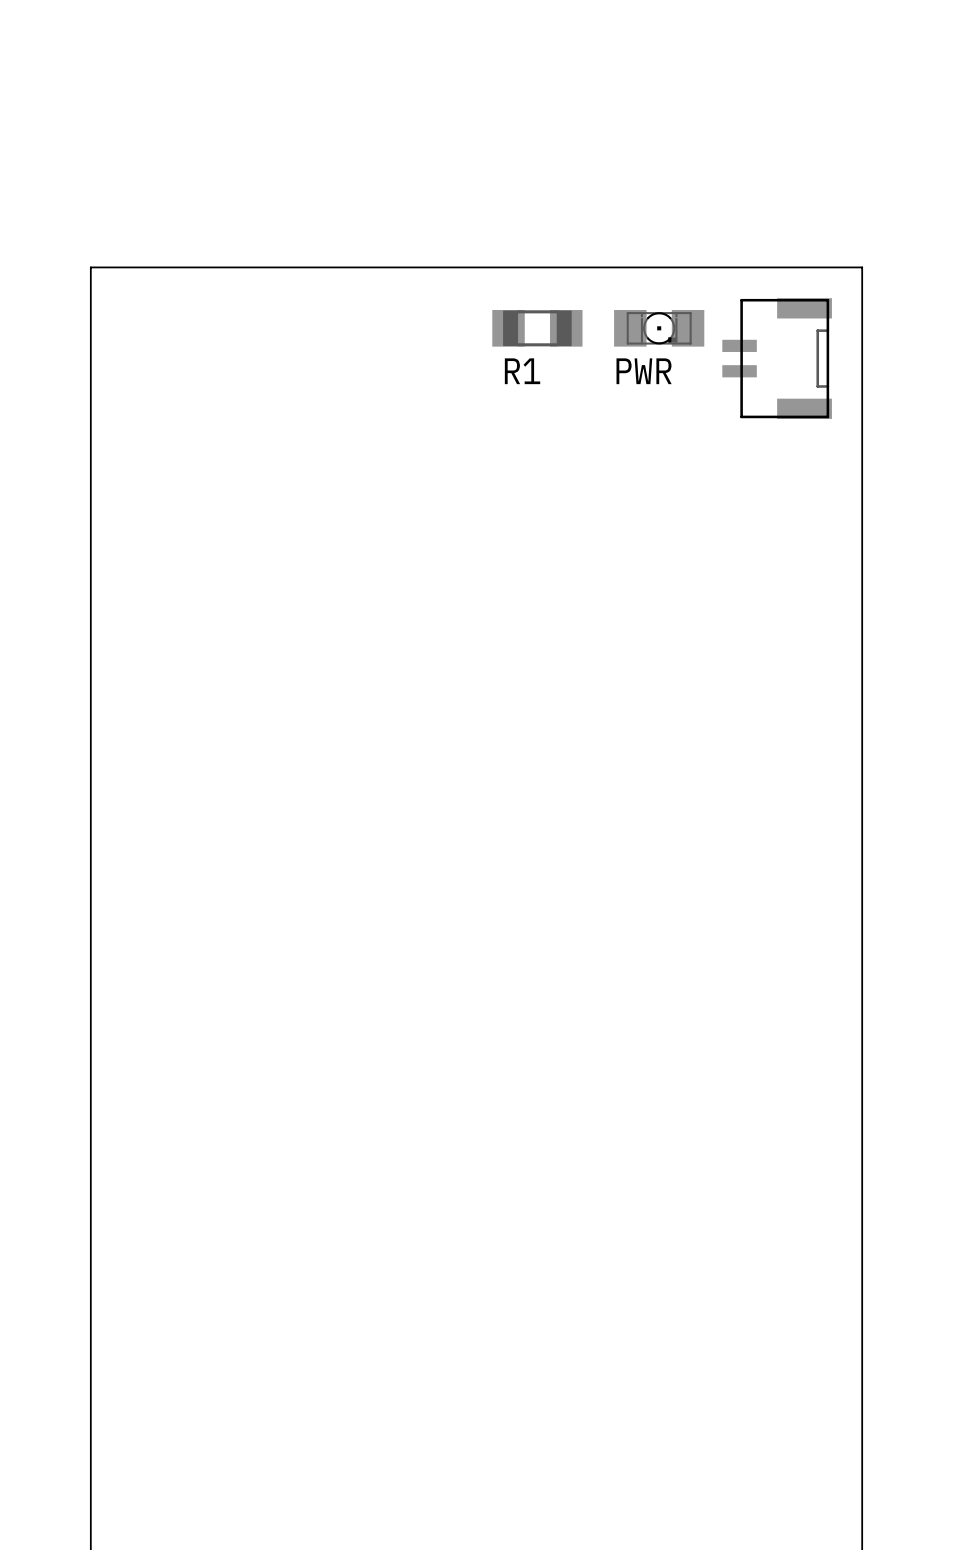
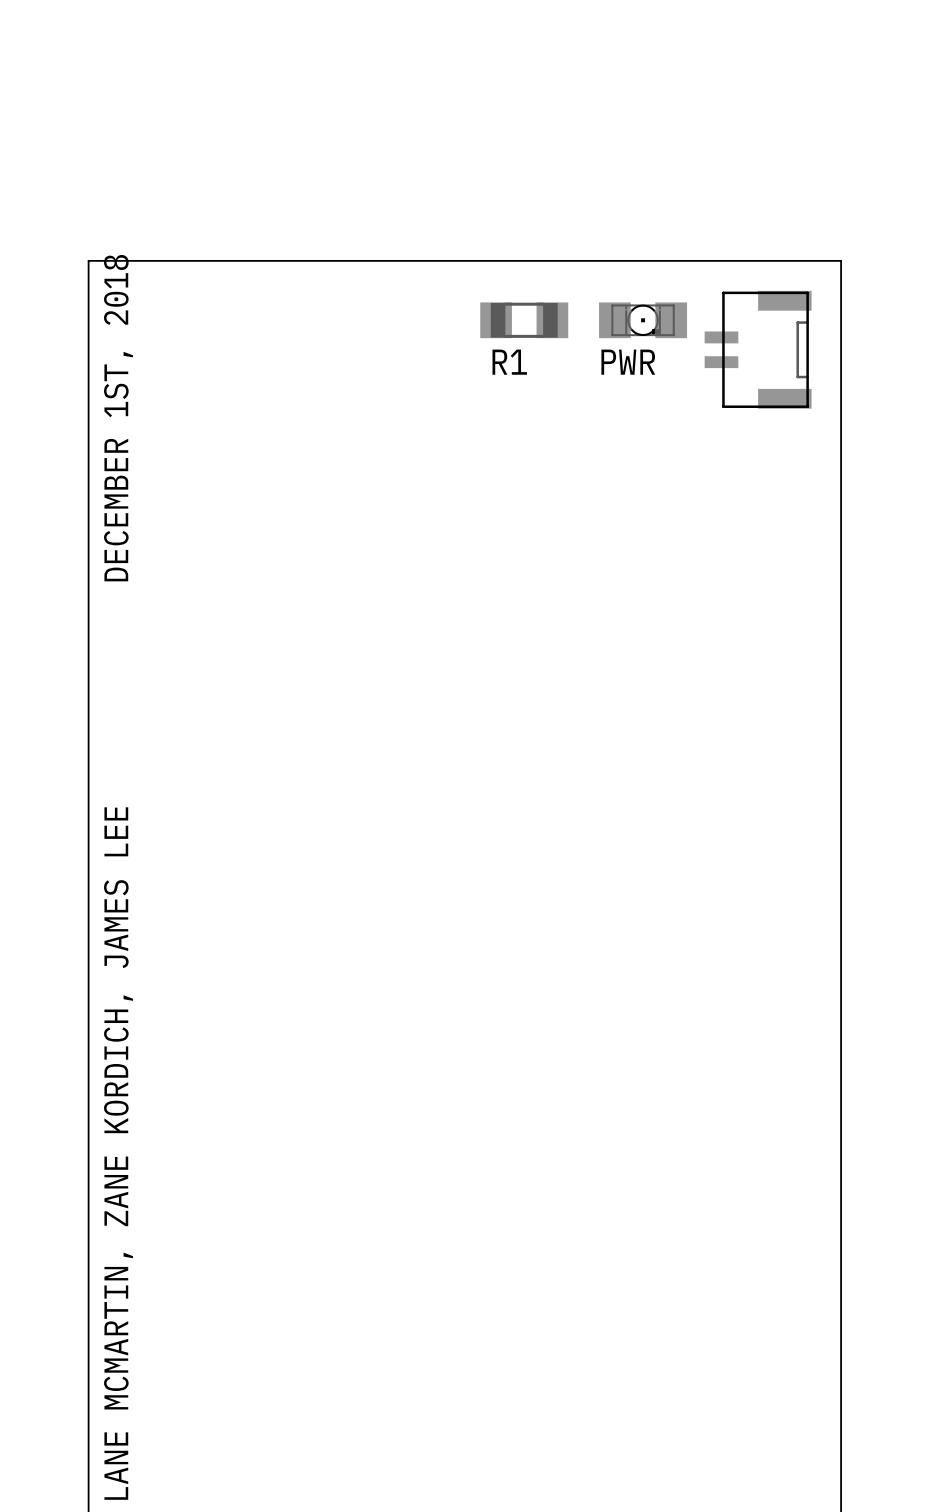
text: none -> LANE MCMARTIN, ZANE KORDICH, JAMES LEE DECEMBER 1ST, 2018 (118, 877)

